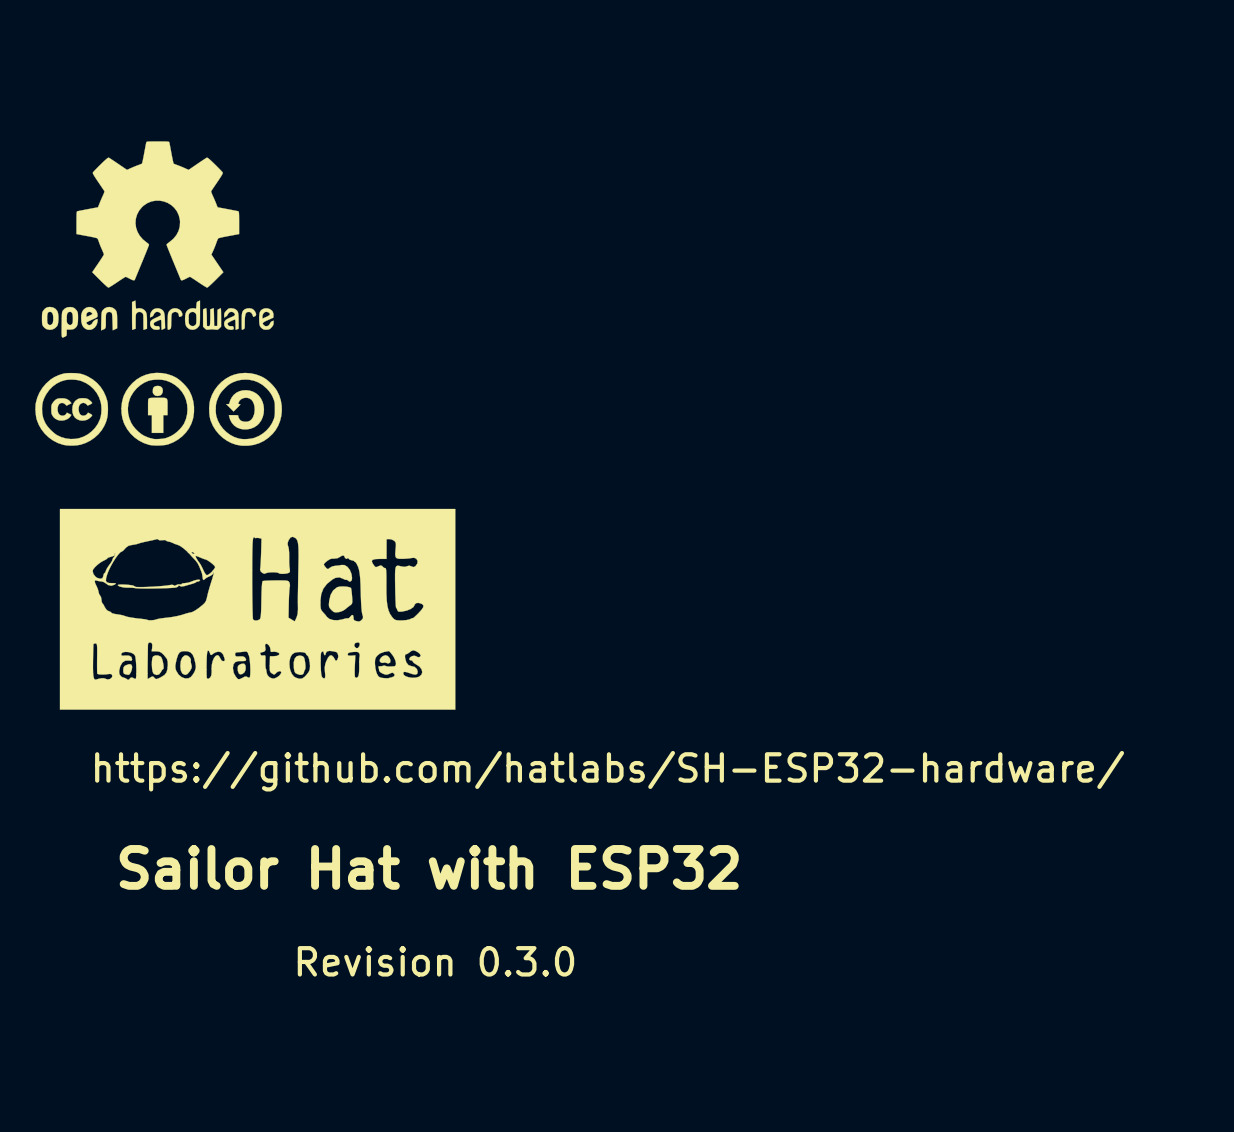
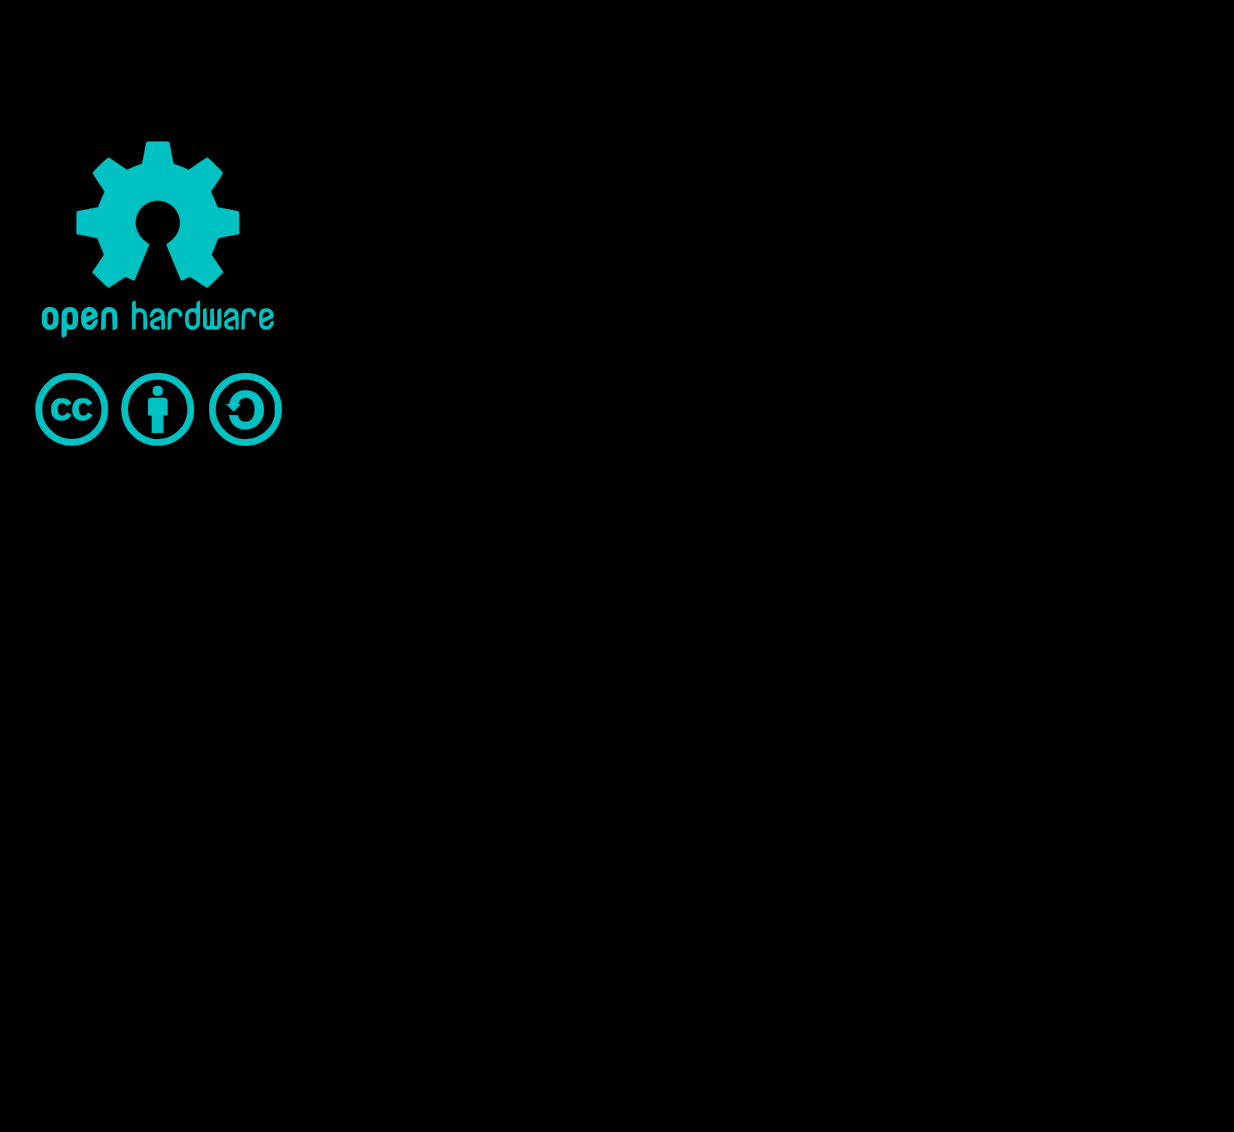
drawing: [59, 508, 456, 710] -> none
text: https://github.com/hatlabs/SH-ESP32-hardware/ (609, 771) -> none
text: Sailor Hat with ESP32 (429, 867) -> none
text: Revision 0.3.0 (435, 961) -> none

